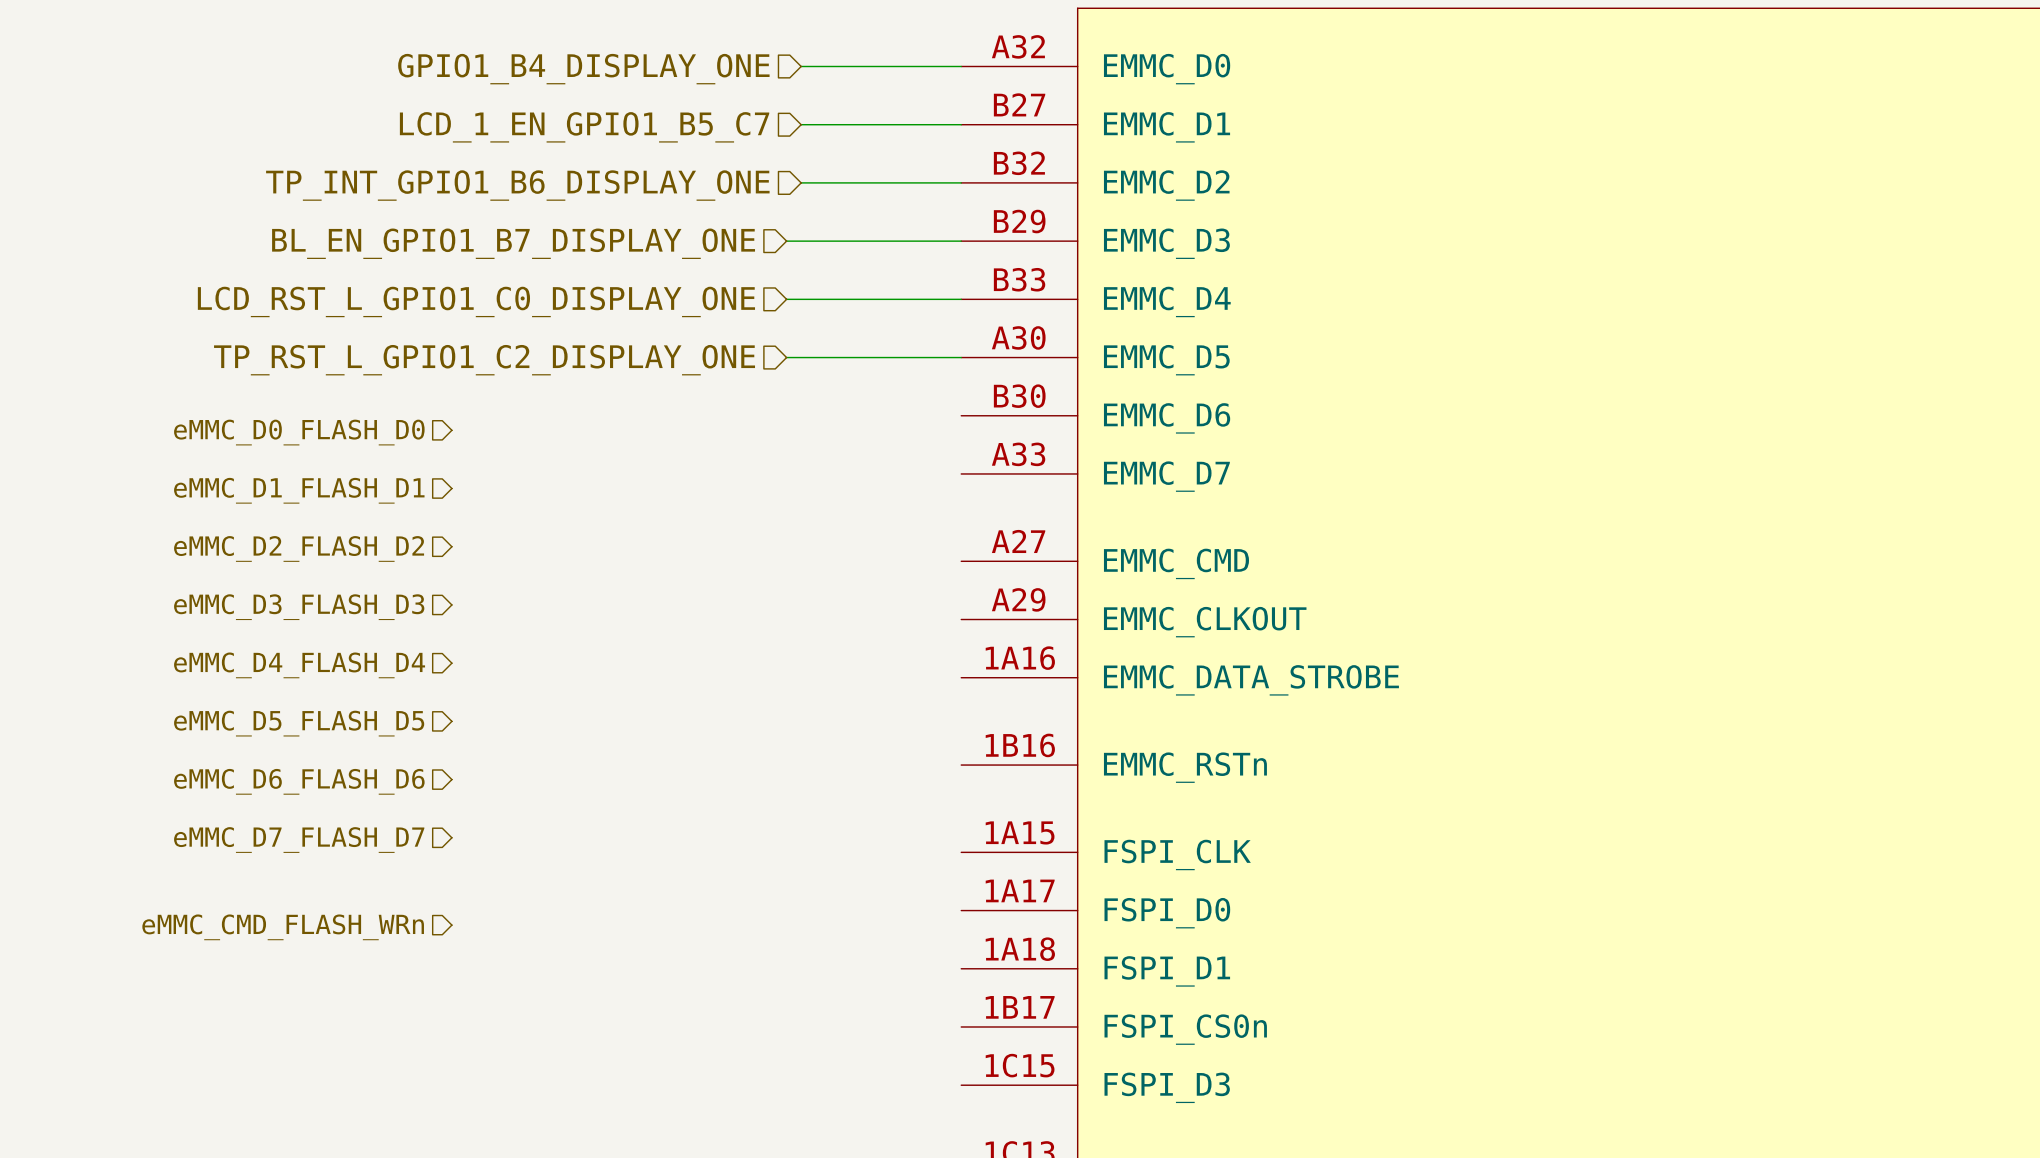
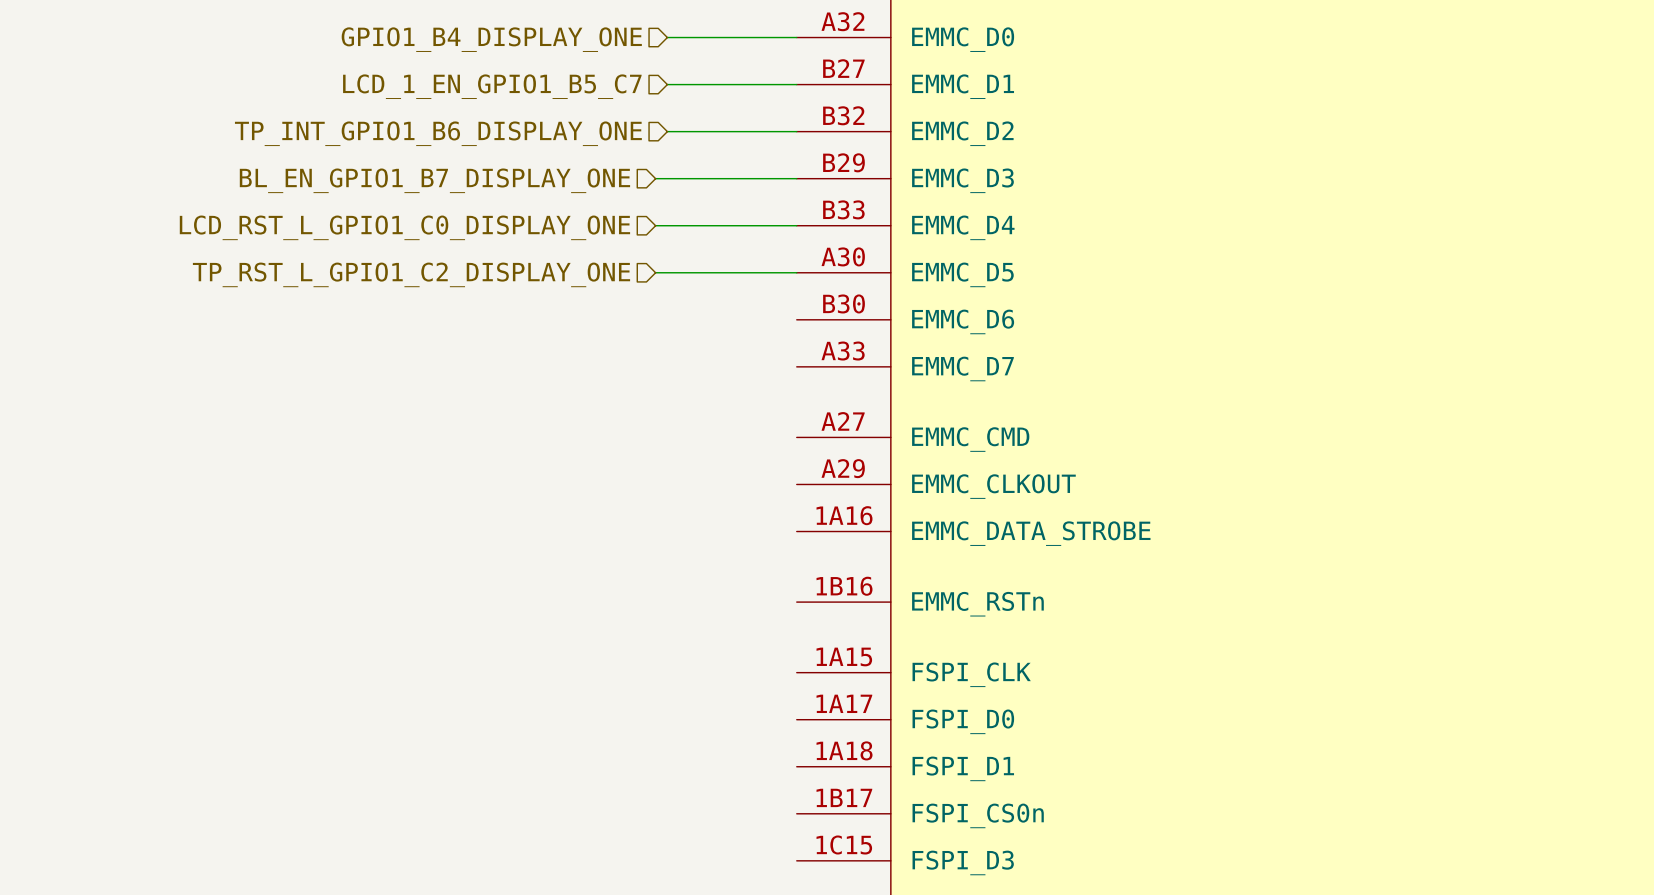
hierarchical label: eMMC_D0_FLASH_D0 (299, 432) -> none
hierarchical label: eMMC_D1_FLASH_D1 (299, 490) -> none
hierarchical label: eMMC_D2_FLASH_D2 (299, 548) -> none
hierarchical label: eMMC_D3_FLASH_D3 (299, 607) -> none
hierarchical label: eMMC_D4_FLASH_D4 (299, 665) -> none
hierarchical label: eMMC_D5_FLASH_D5 (299, 723) -> none
hierarchical label: eMMC_D6_FLASH_D6 (299, 781) -> none
hierarchical label: eMMC_D7_FLASH_D7 (299, 840) -> none
hierarchical label: eMMC_CMD_FLASH_WRn (283, 927) -> none

